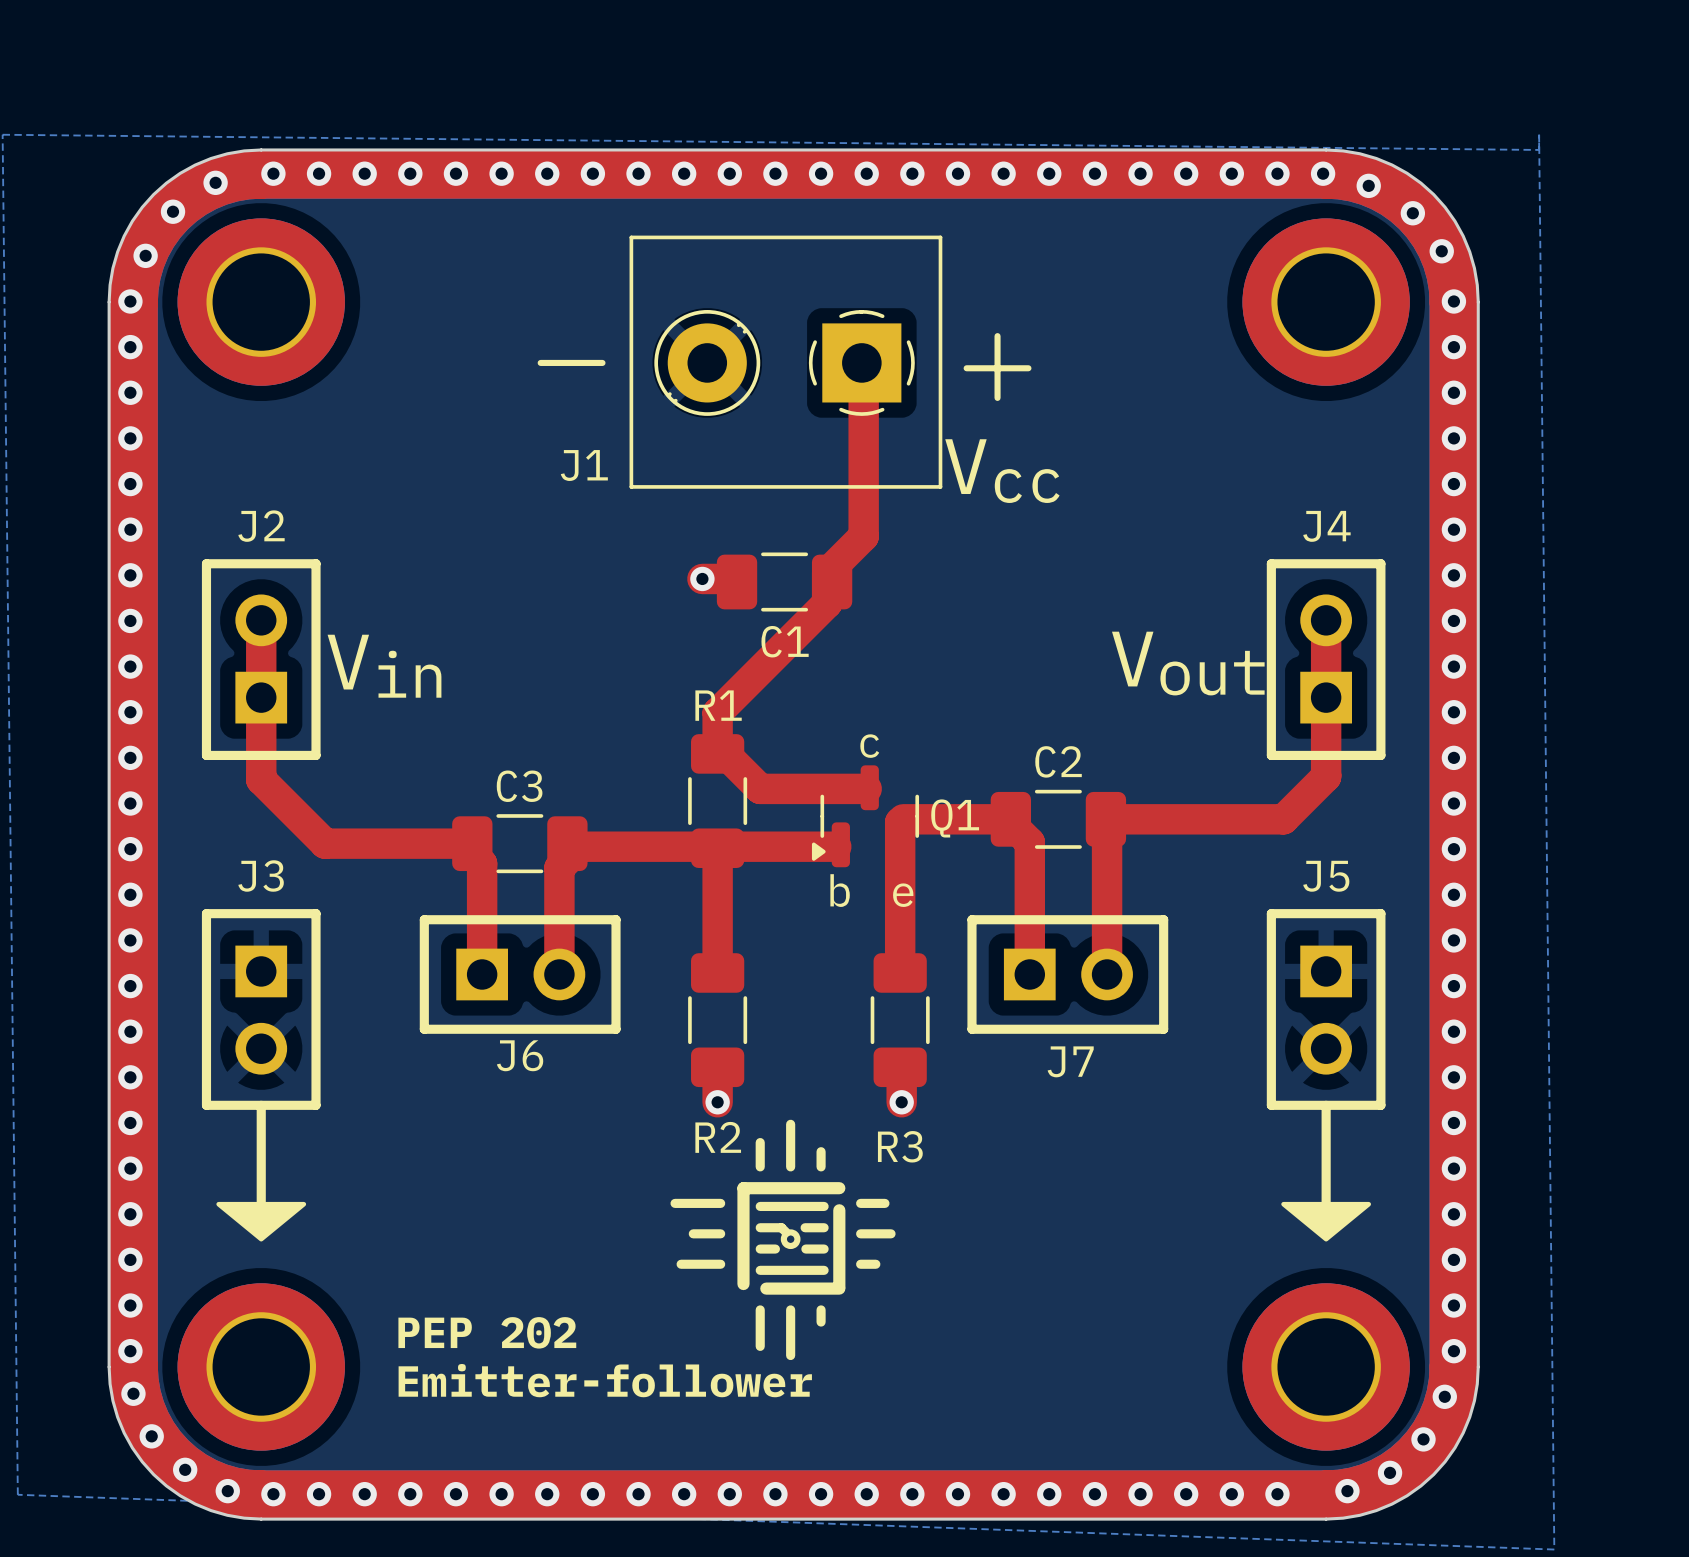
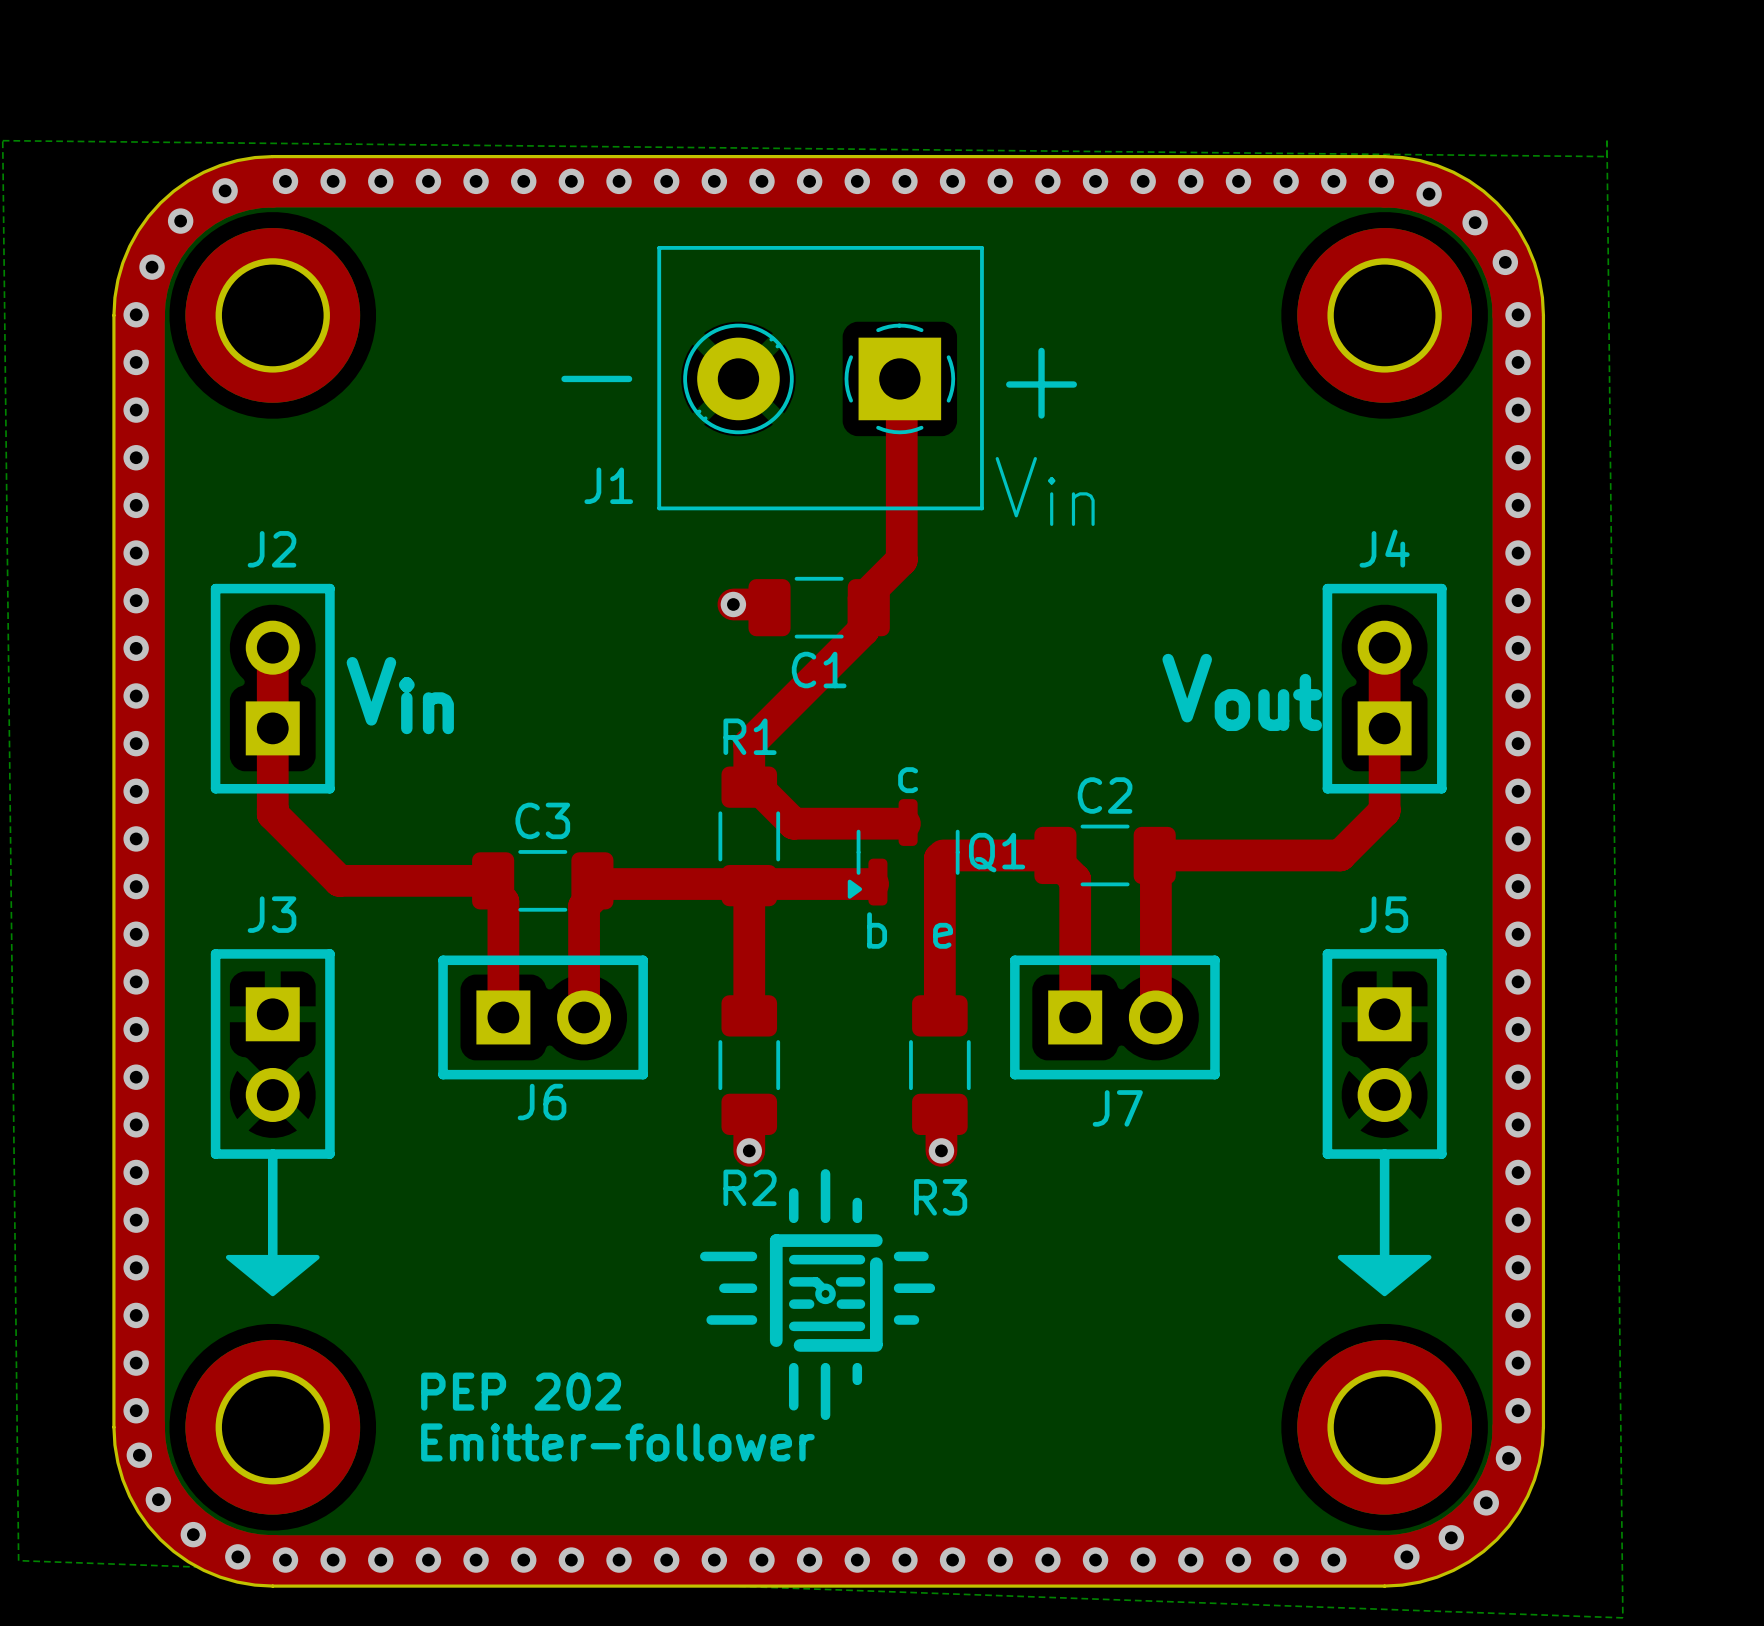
J1 text: Vcc (1002, 471) -> Vin (1045, 491)

